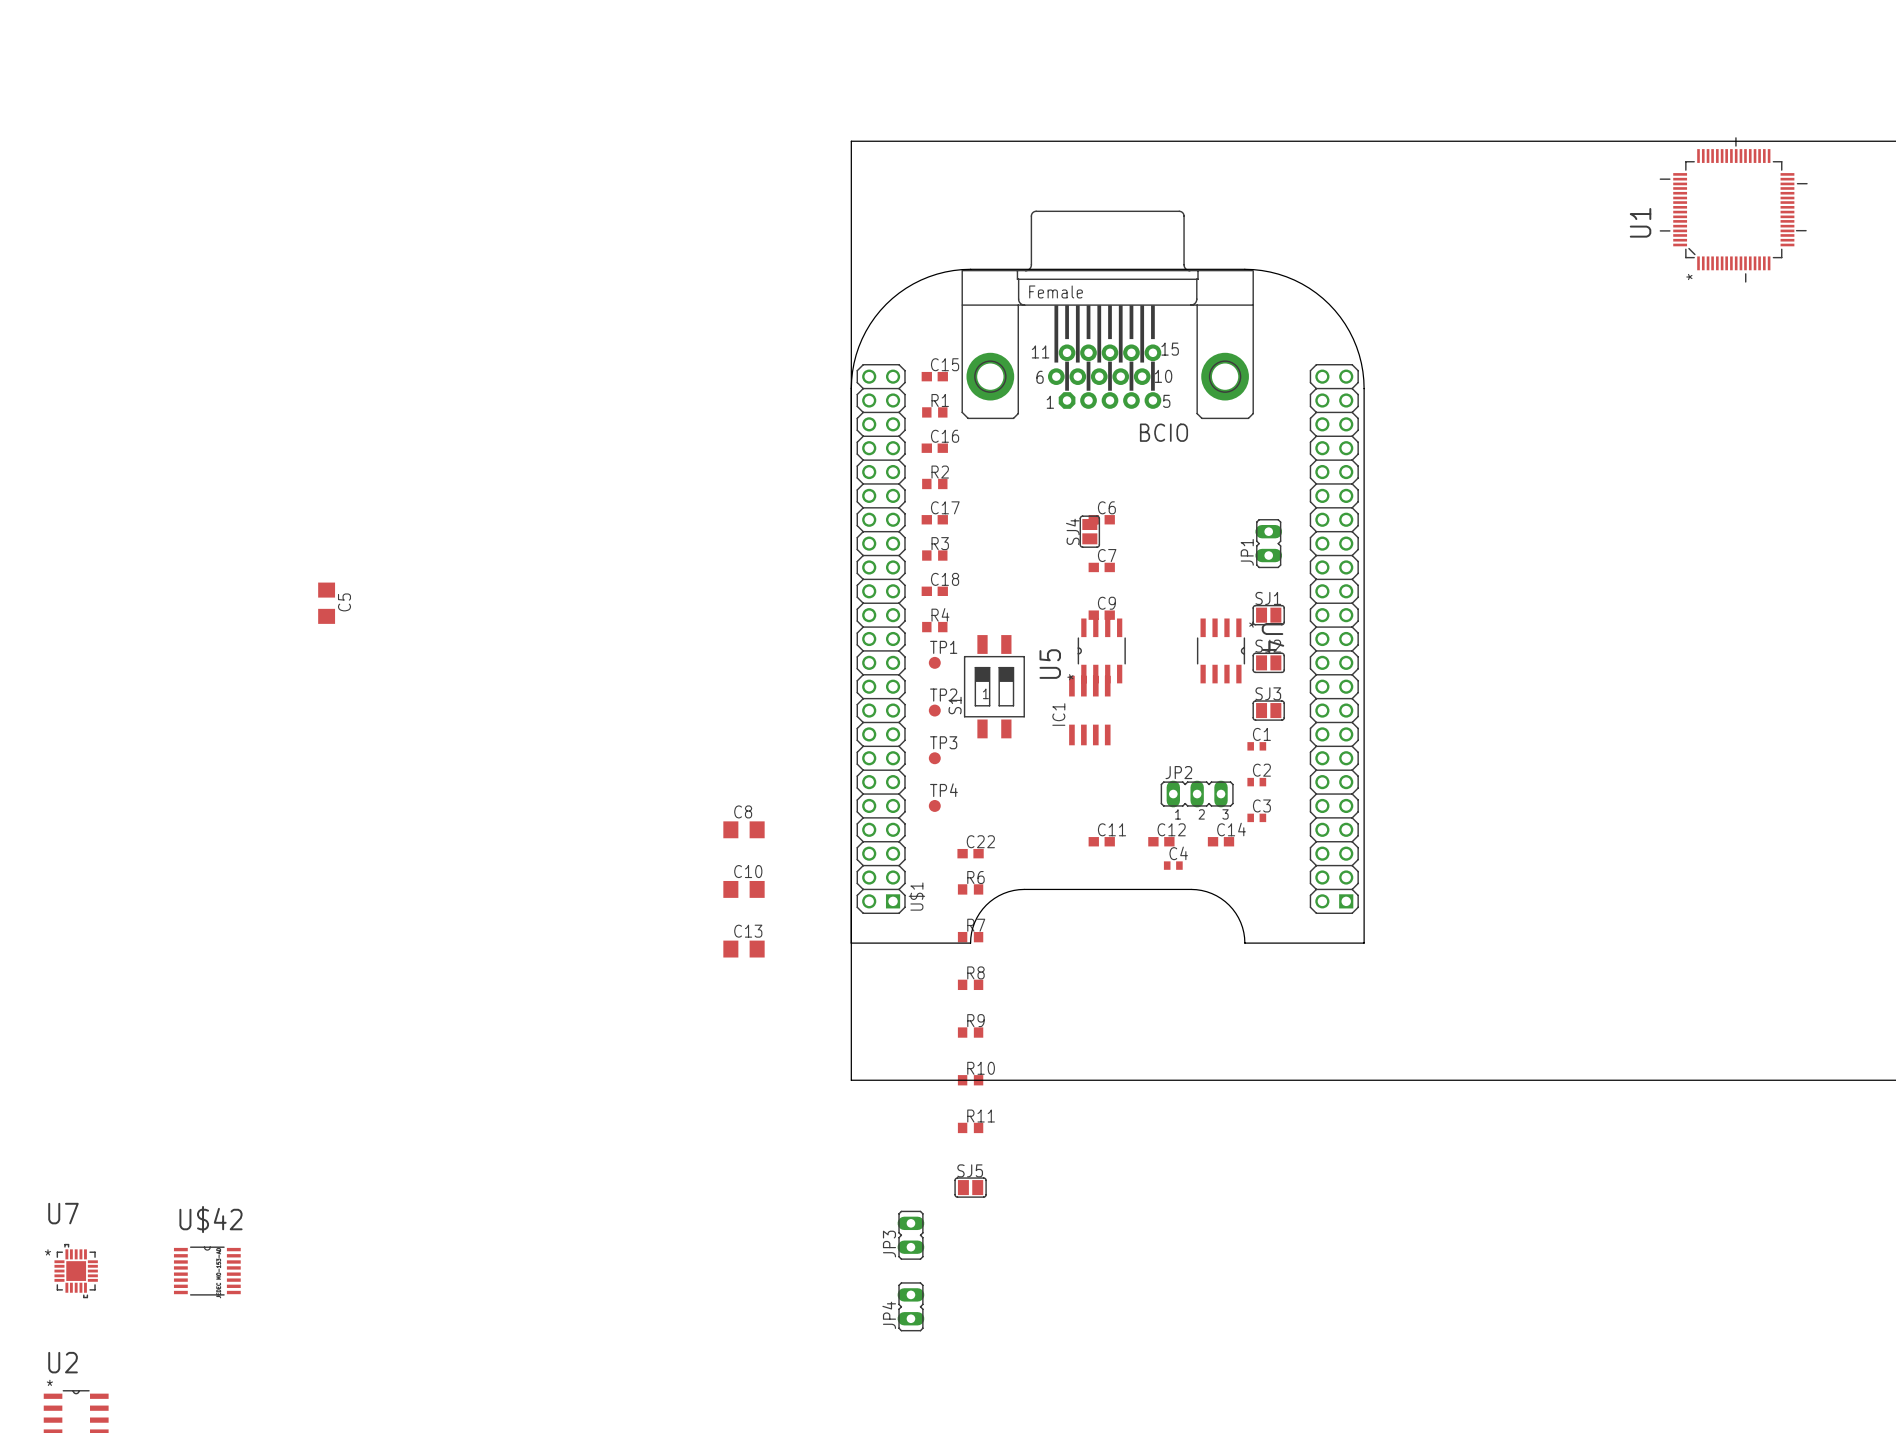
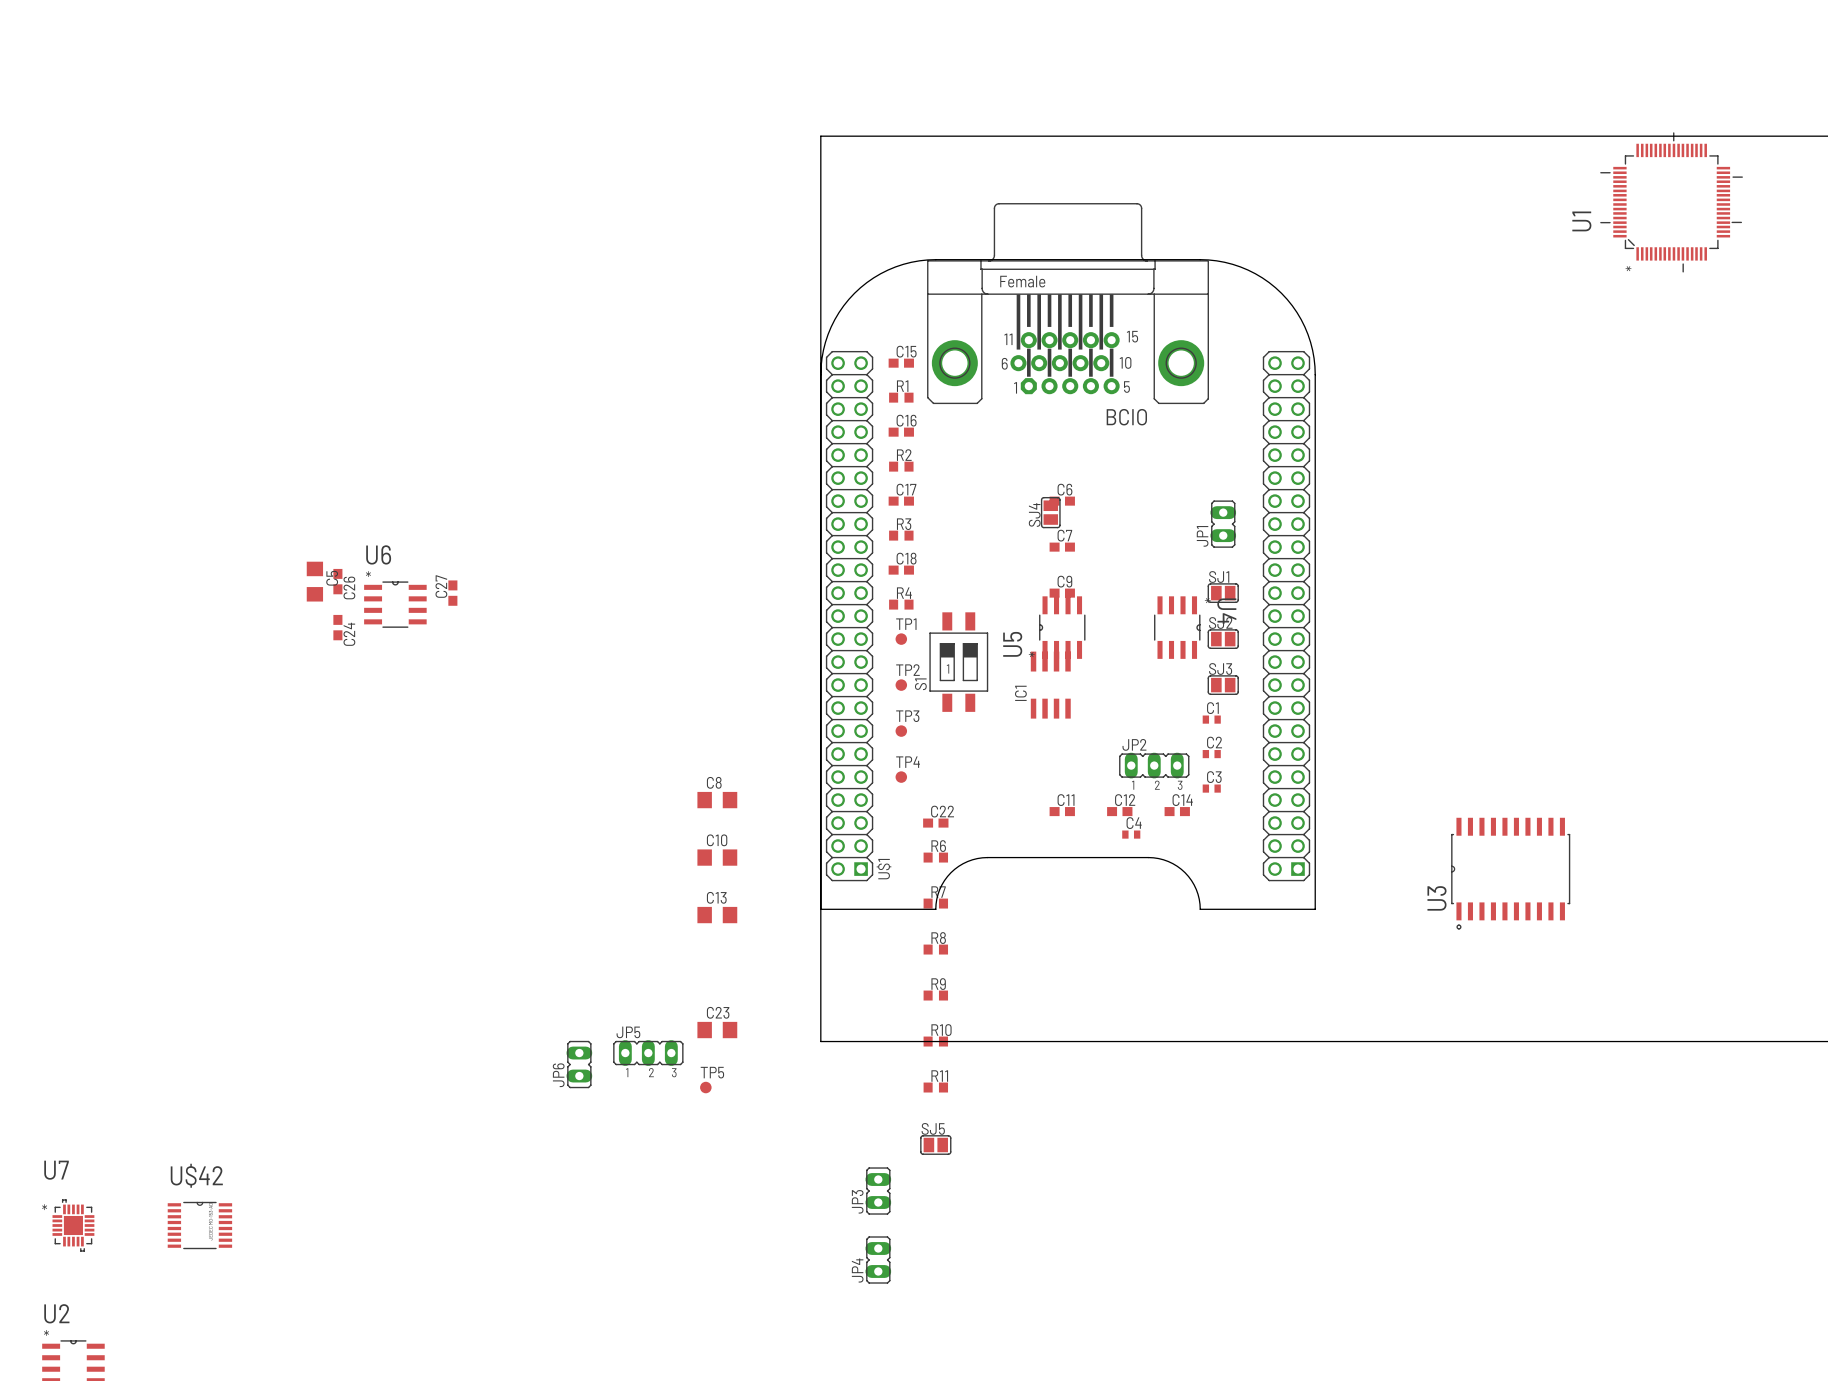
C26: none -> (337, 581)
C27: none -> (452, 593)
U6: none -> (395, 604)
C24: none -> (337, 627)
U3: none -> (1510, 873)
C23: none -> (717, 1030)
JP5: none -> (648, 1053)
JP6: none -> (579, 1064)
TP5: none -> (705, 1087)

